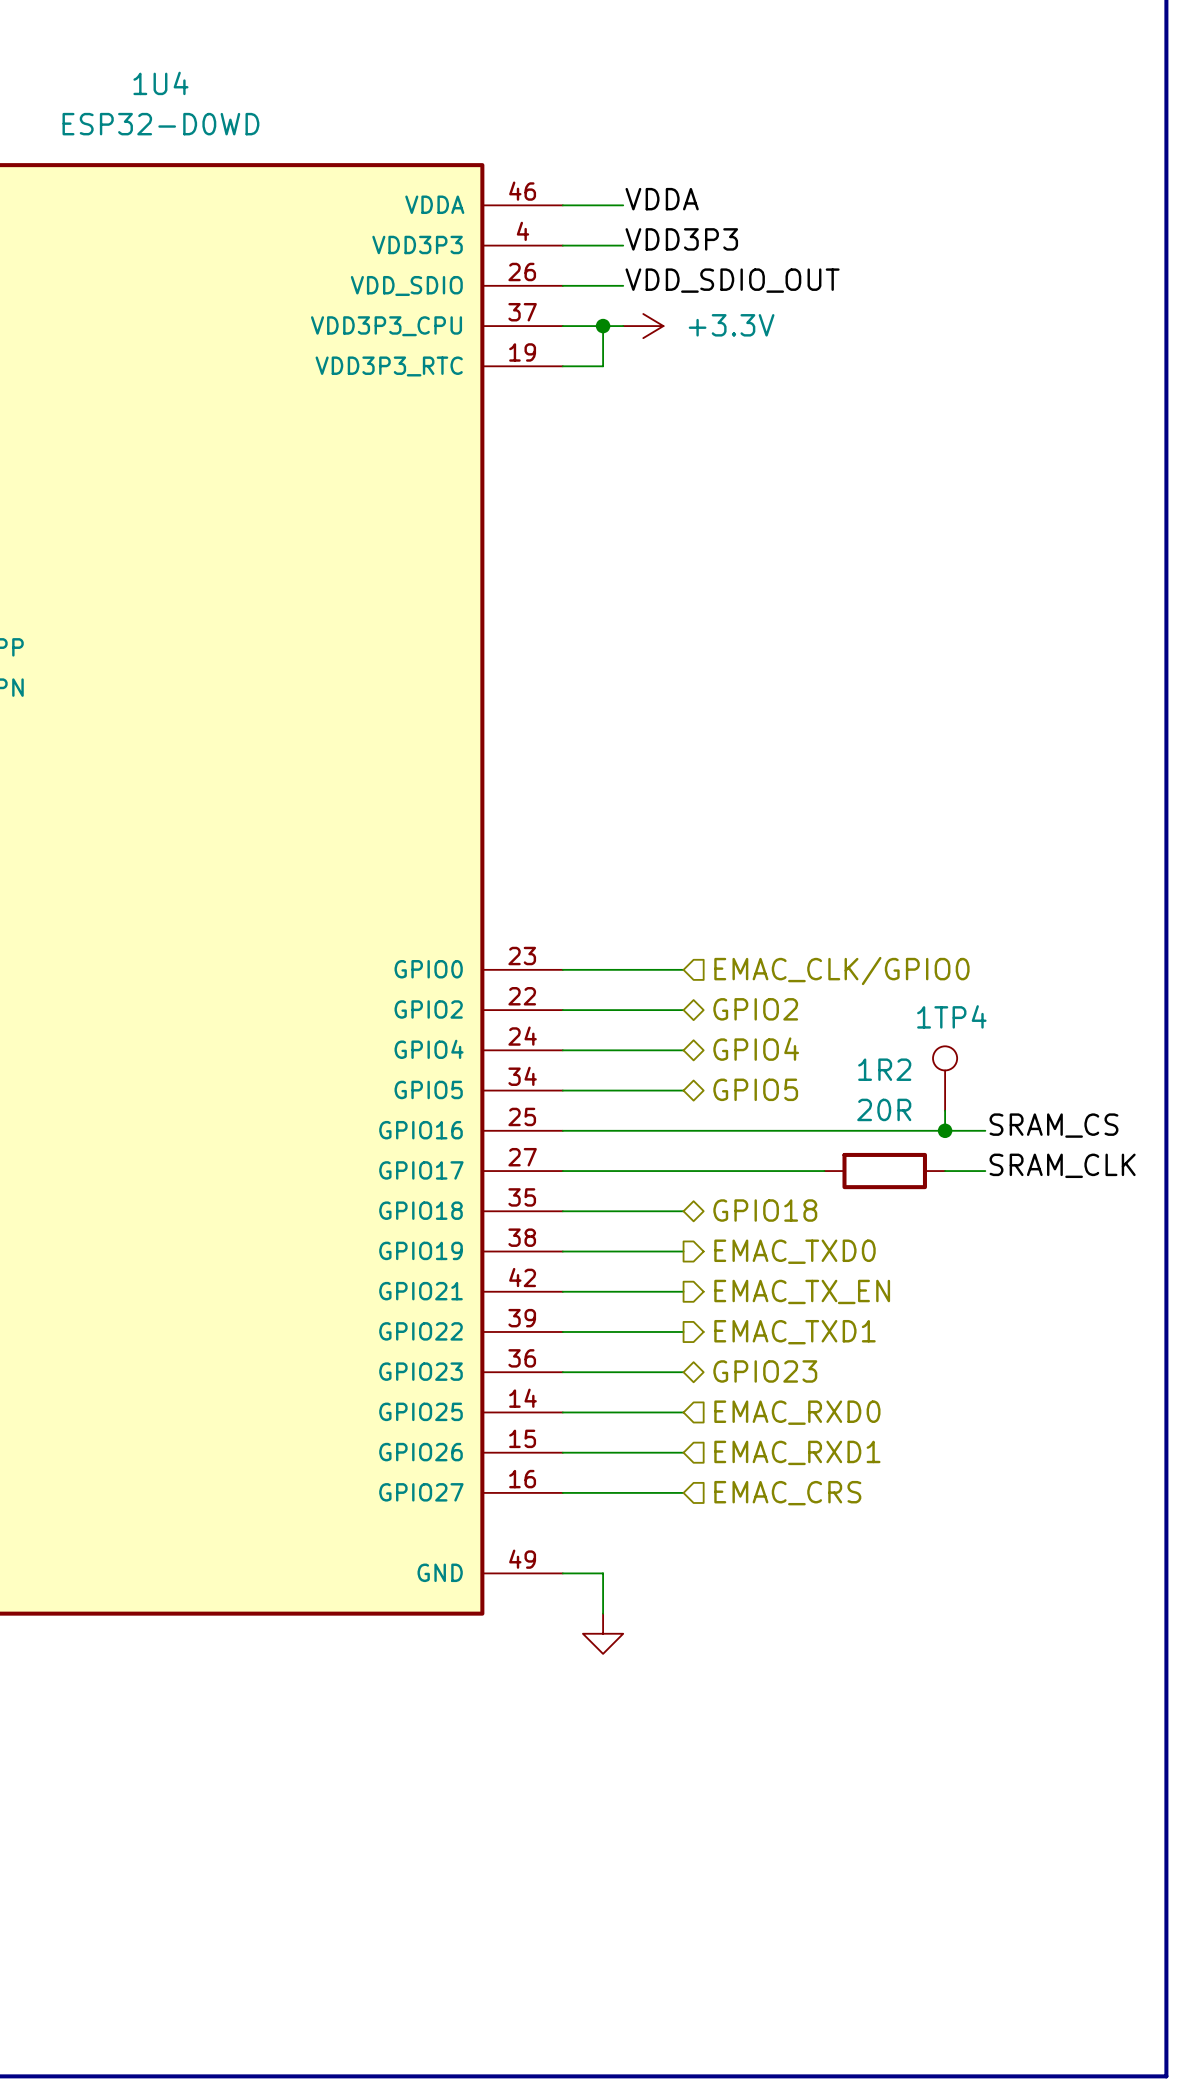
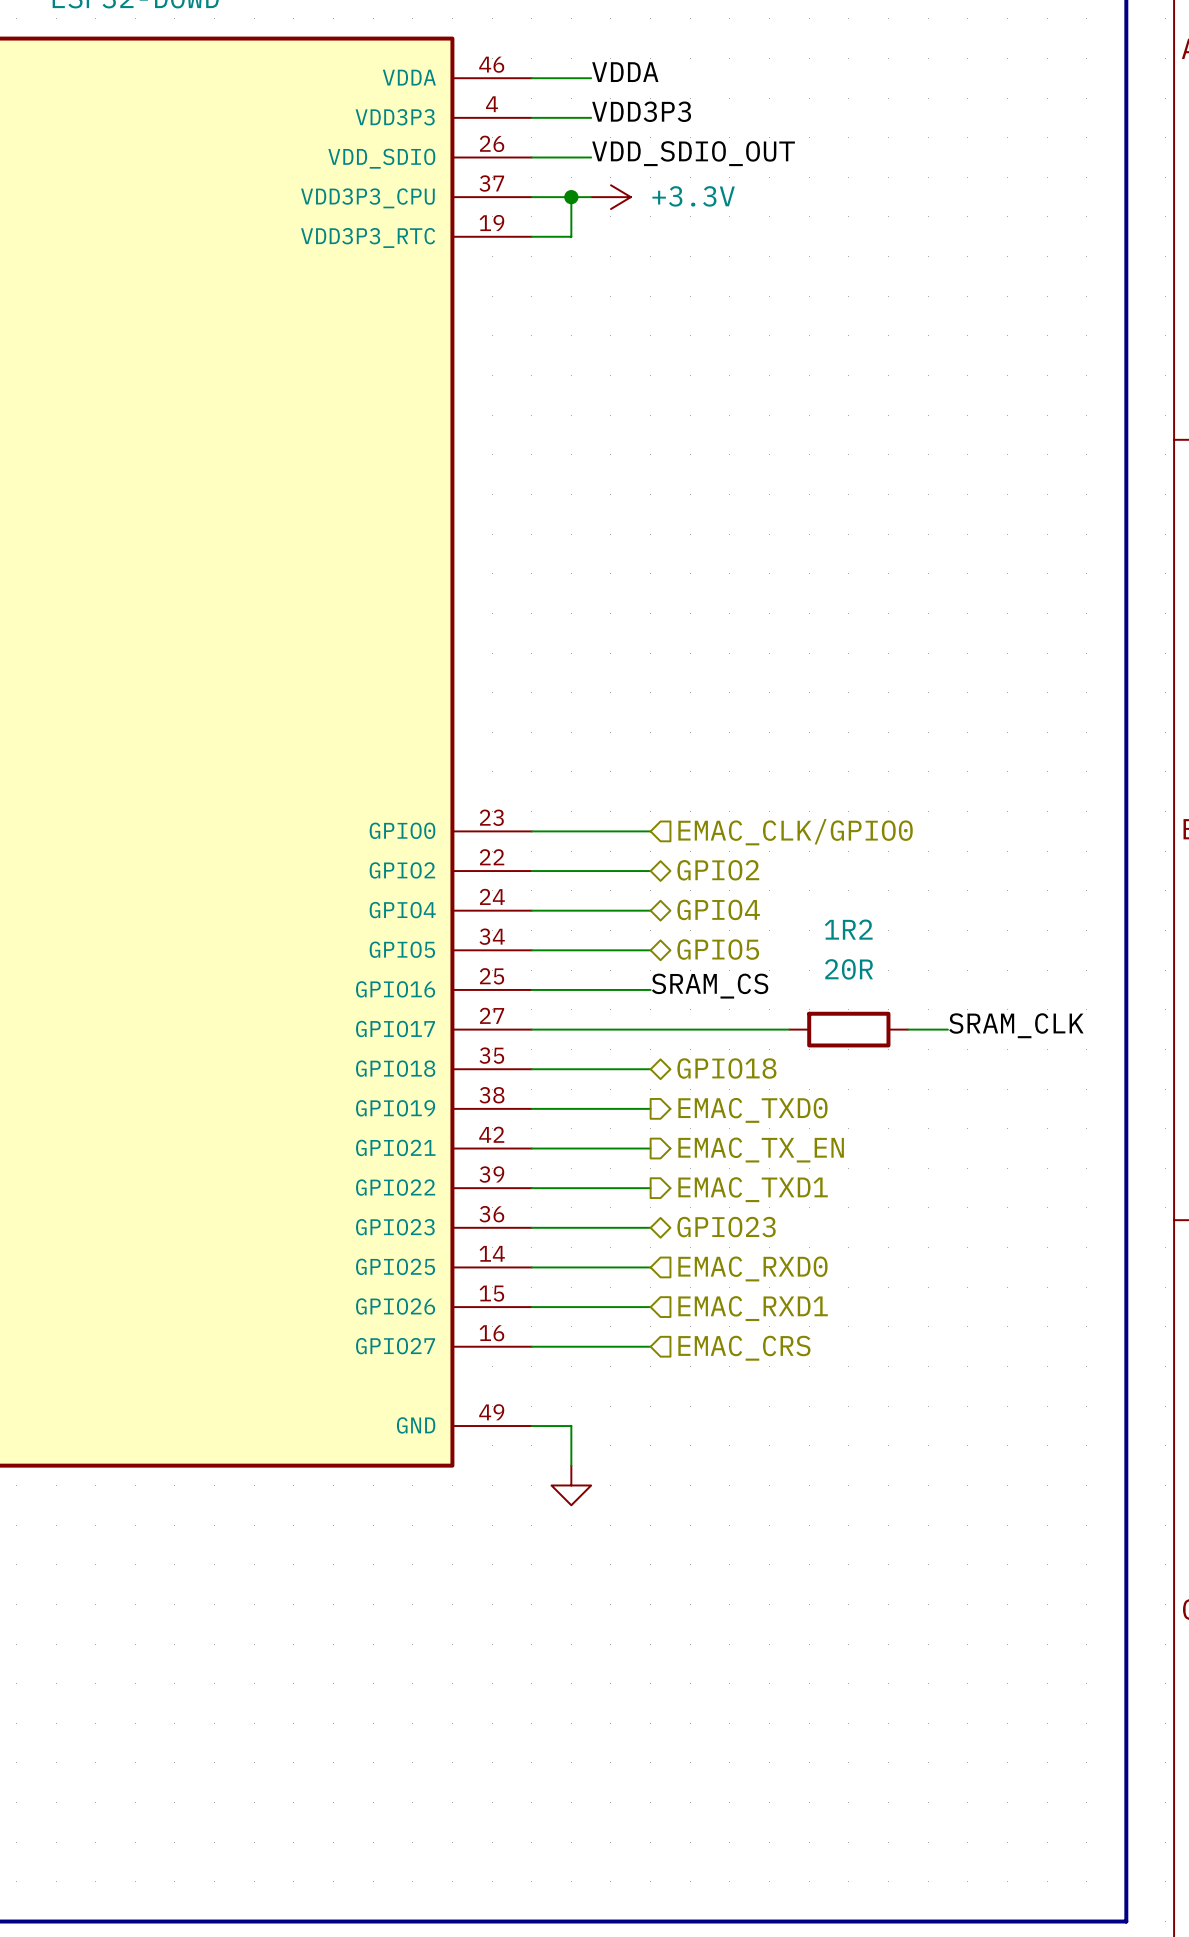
1TP4: (945, 1078) -> none
wire: (945, 1110) (945, 1130) -> none
label position: SRAM_CS (1053, 1125) -> SRAM_CS (710, 986)
wire: (683, 1130) (985, 1130) -> none
junction: (945, 1130) -> none

